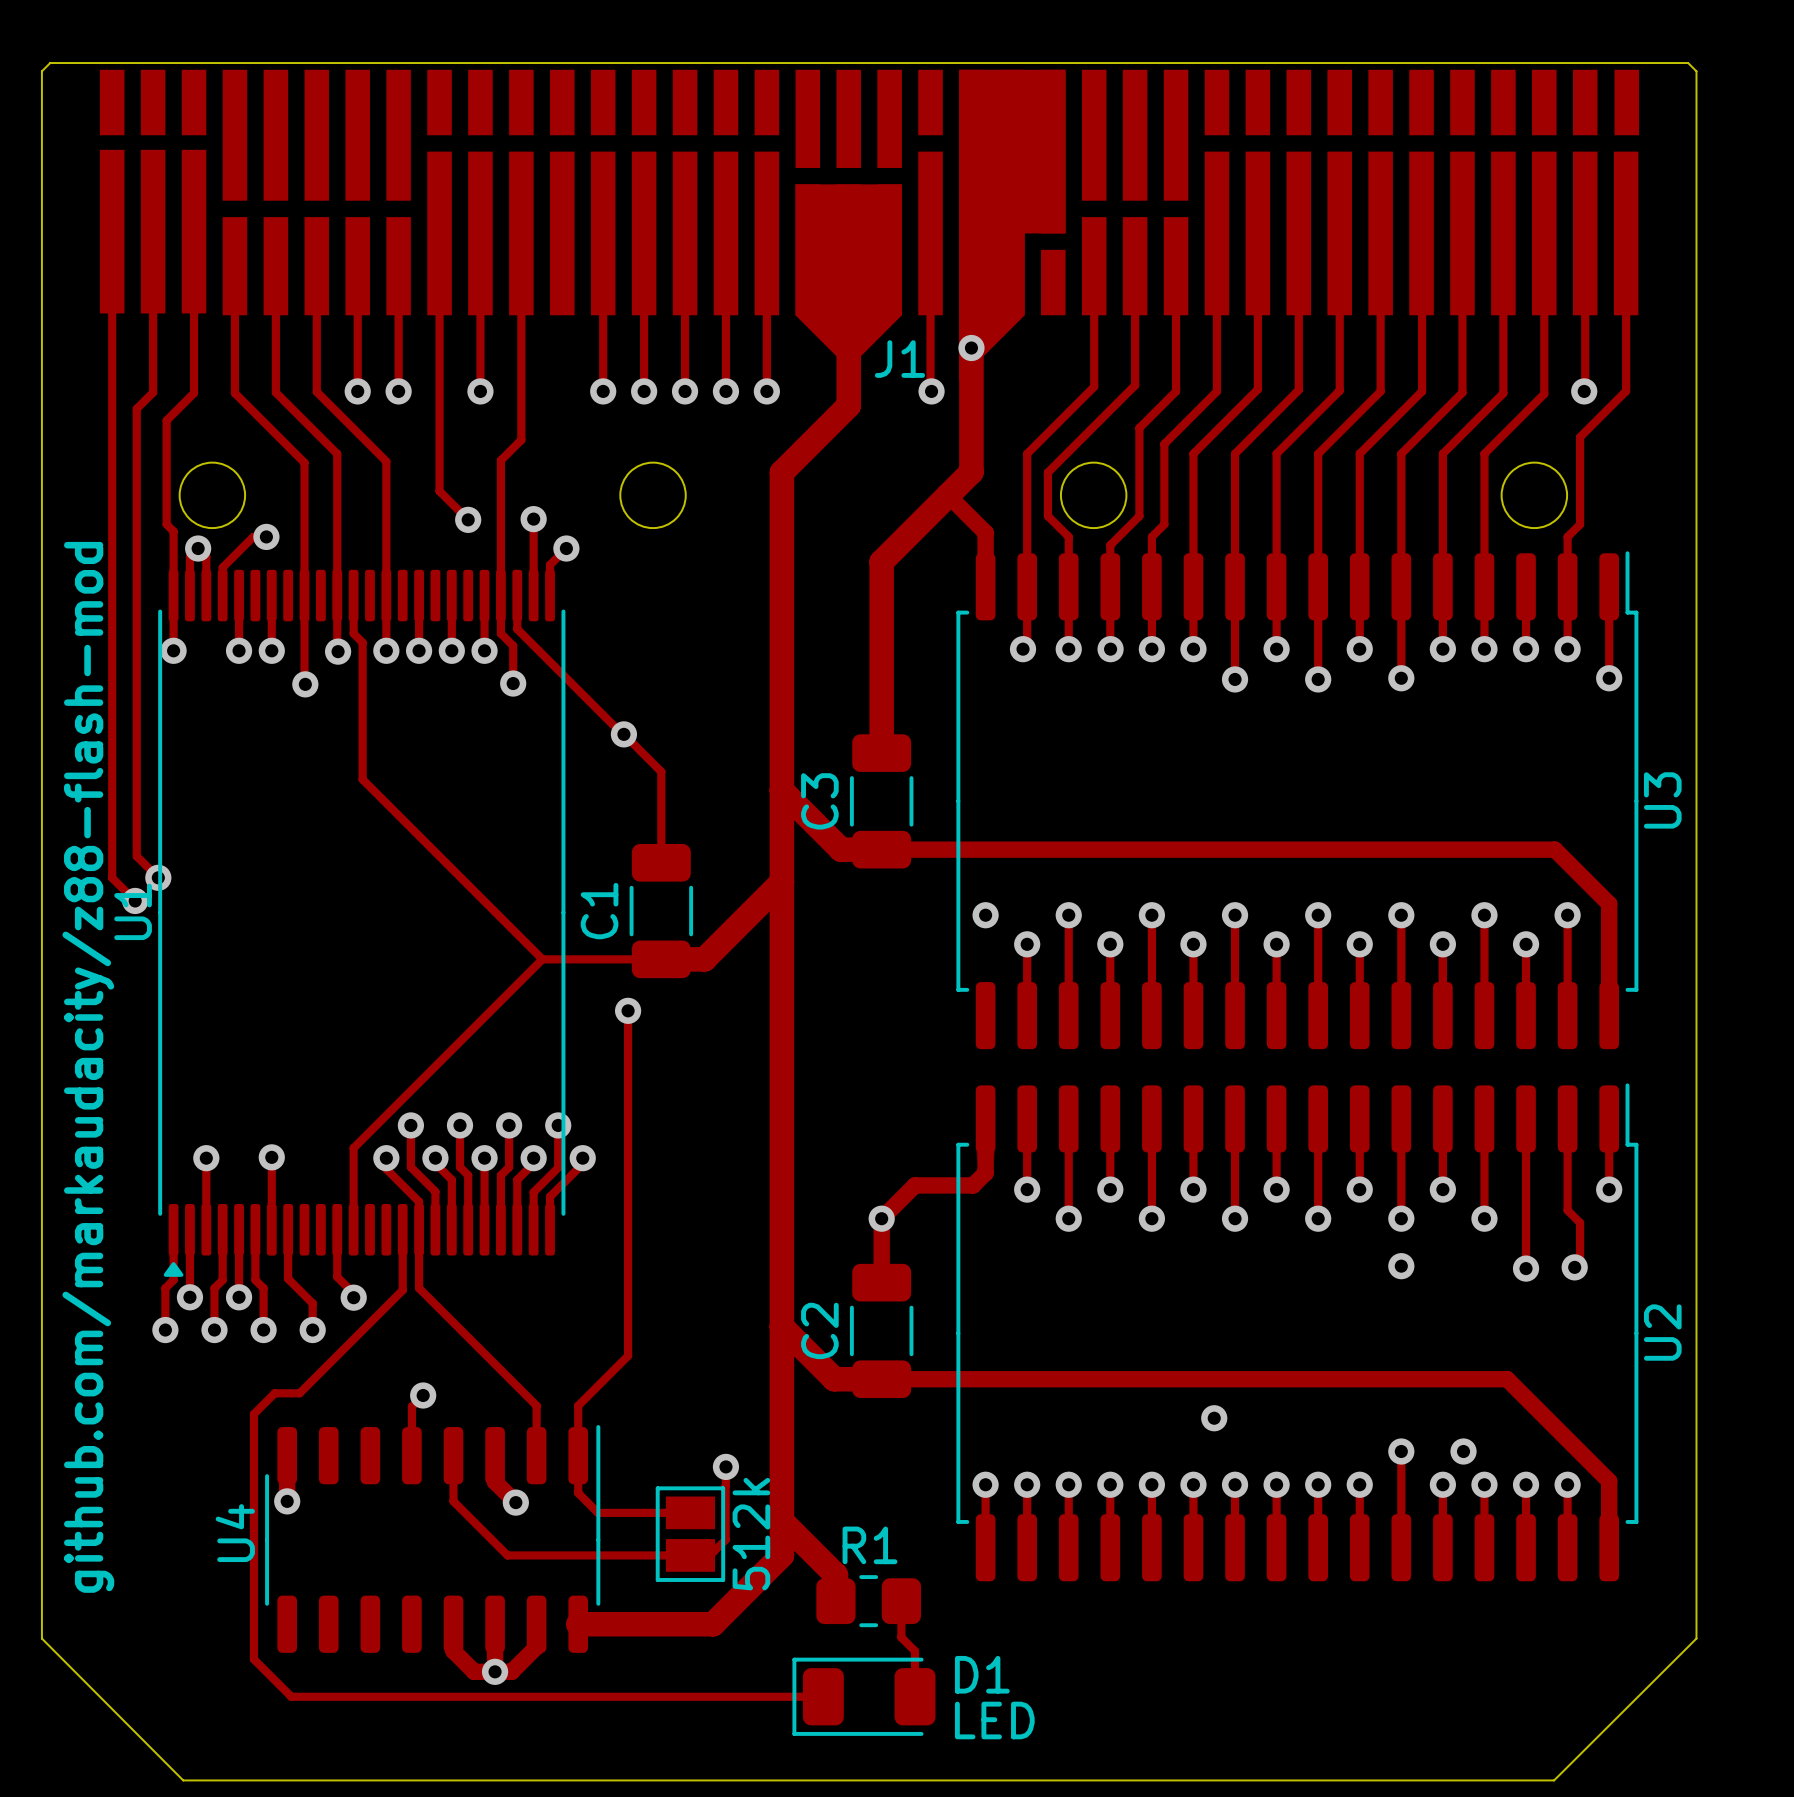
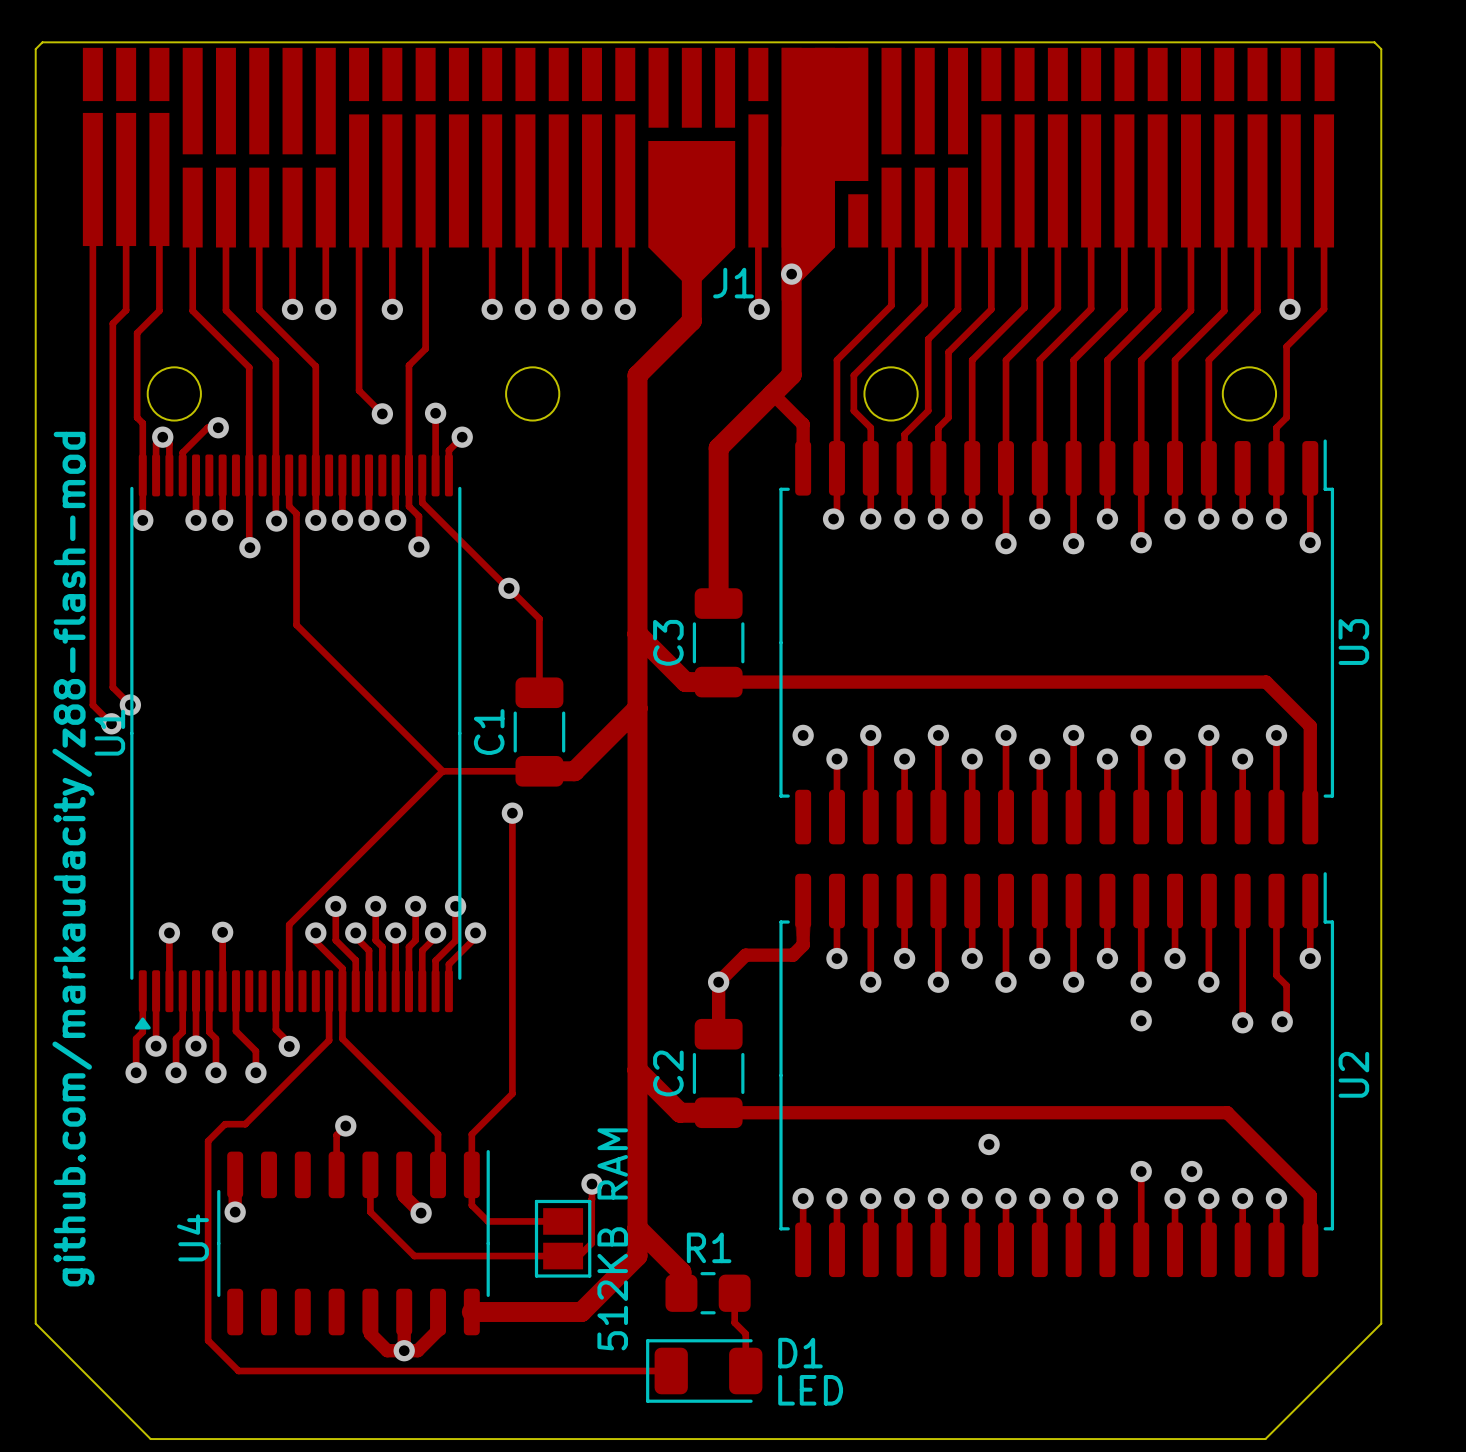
part value: 512k (751, 1534) -> 512KB RAM (612, 1239)

